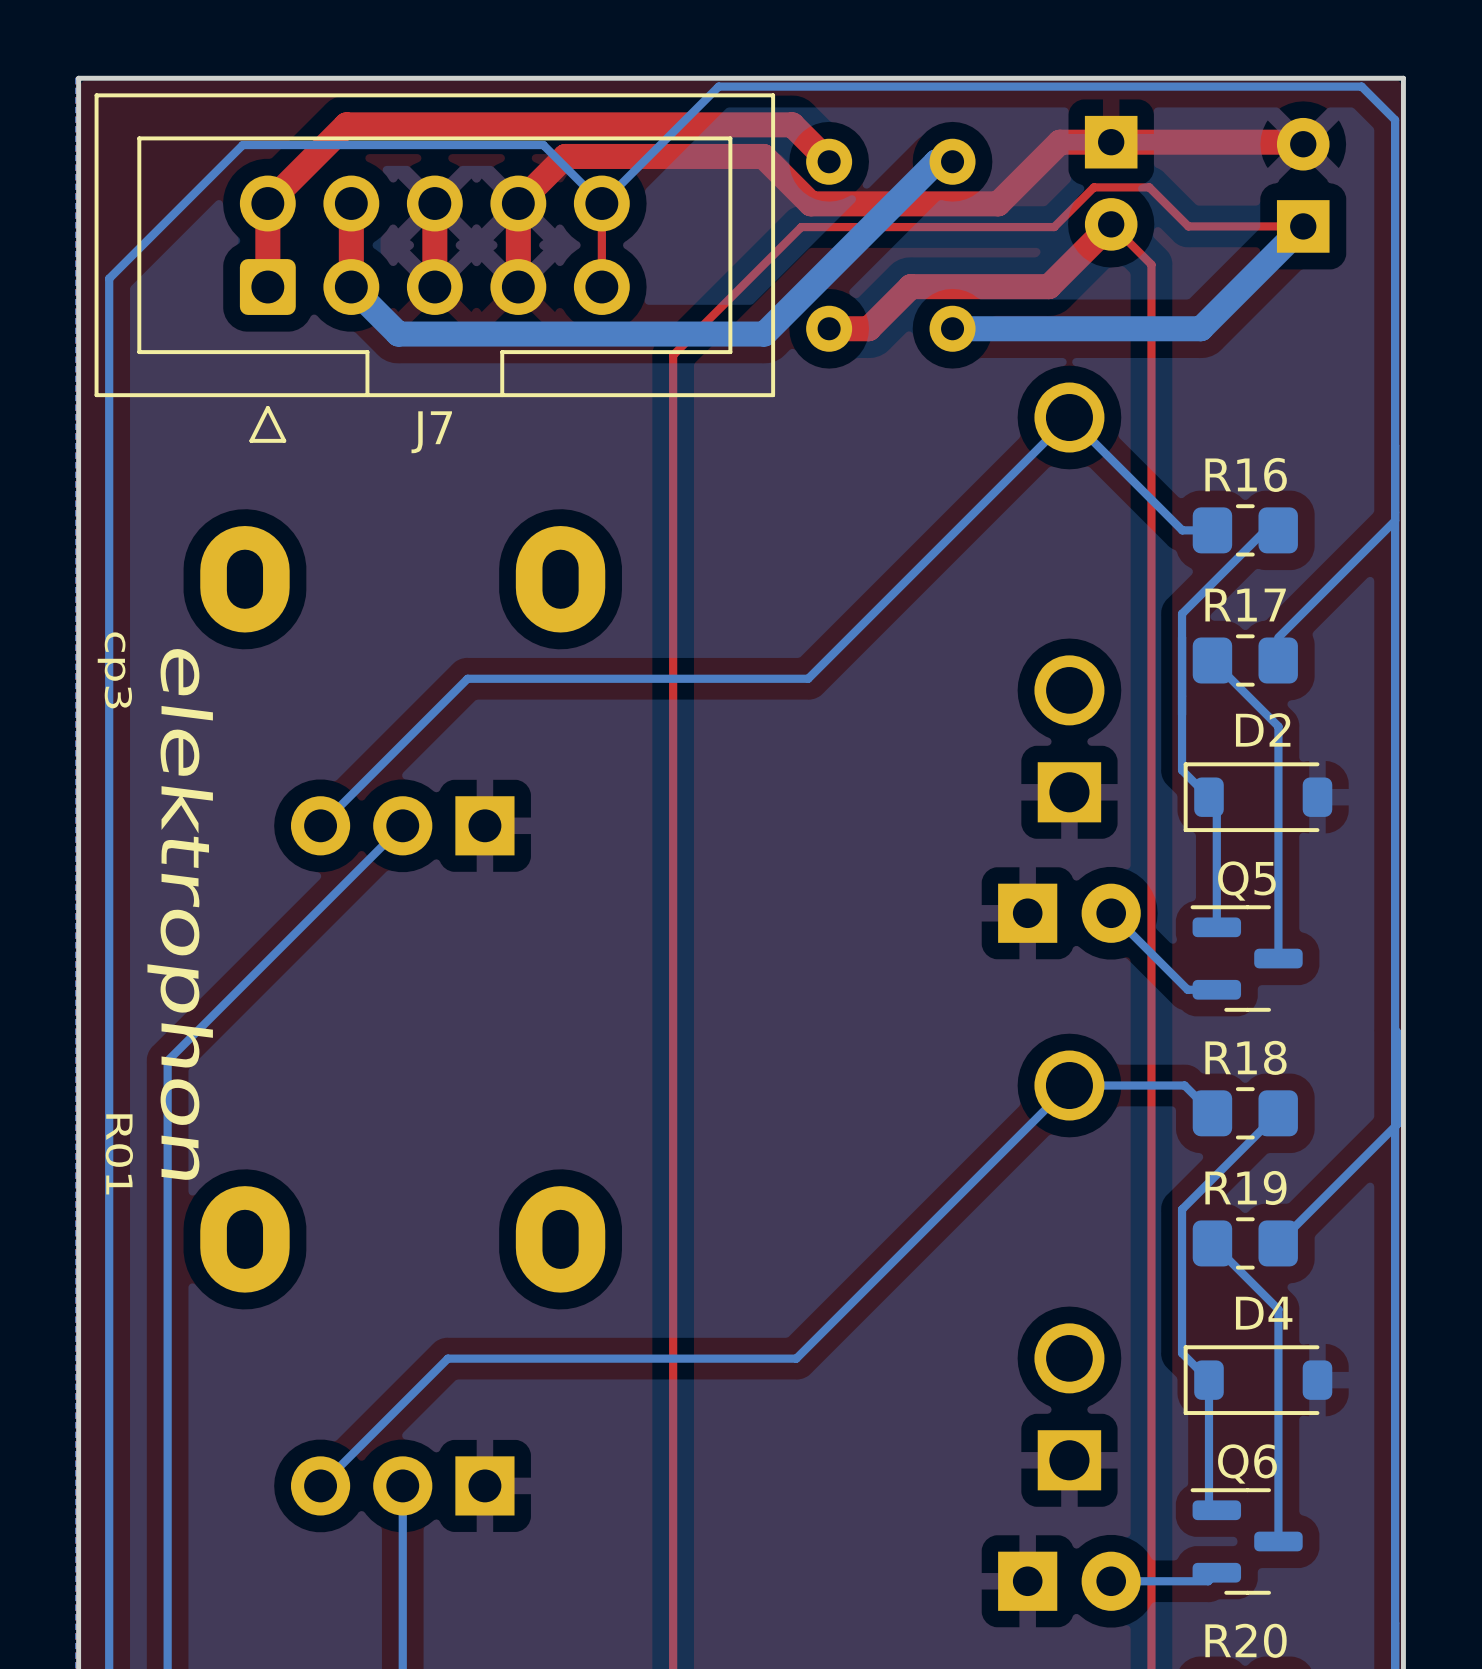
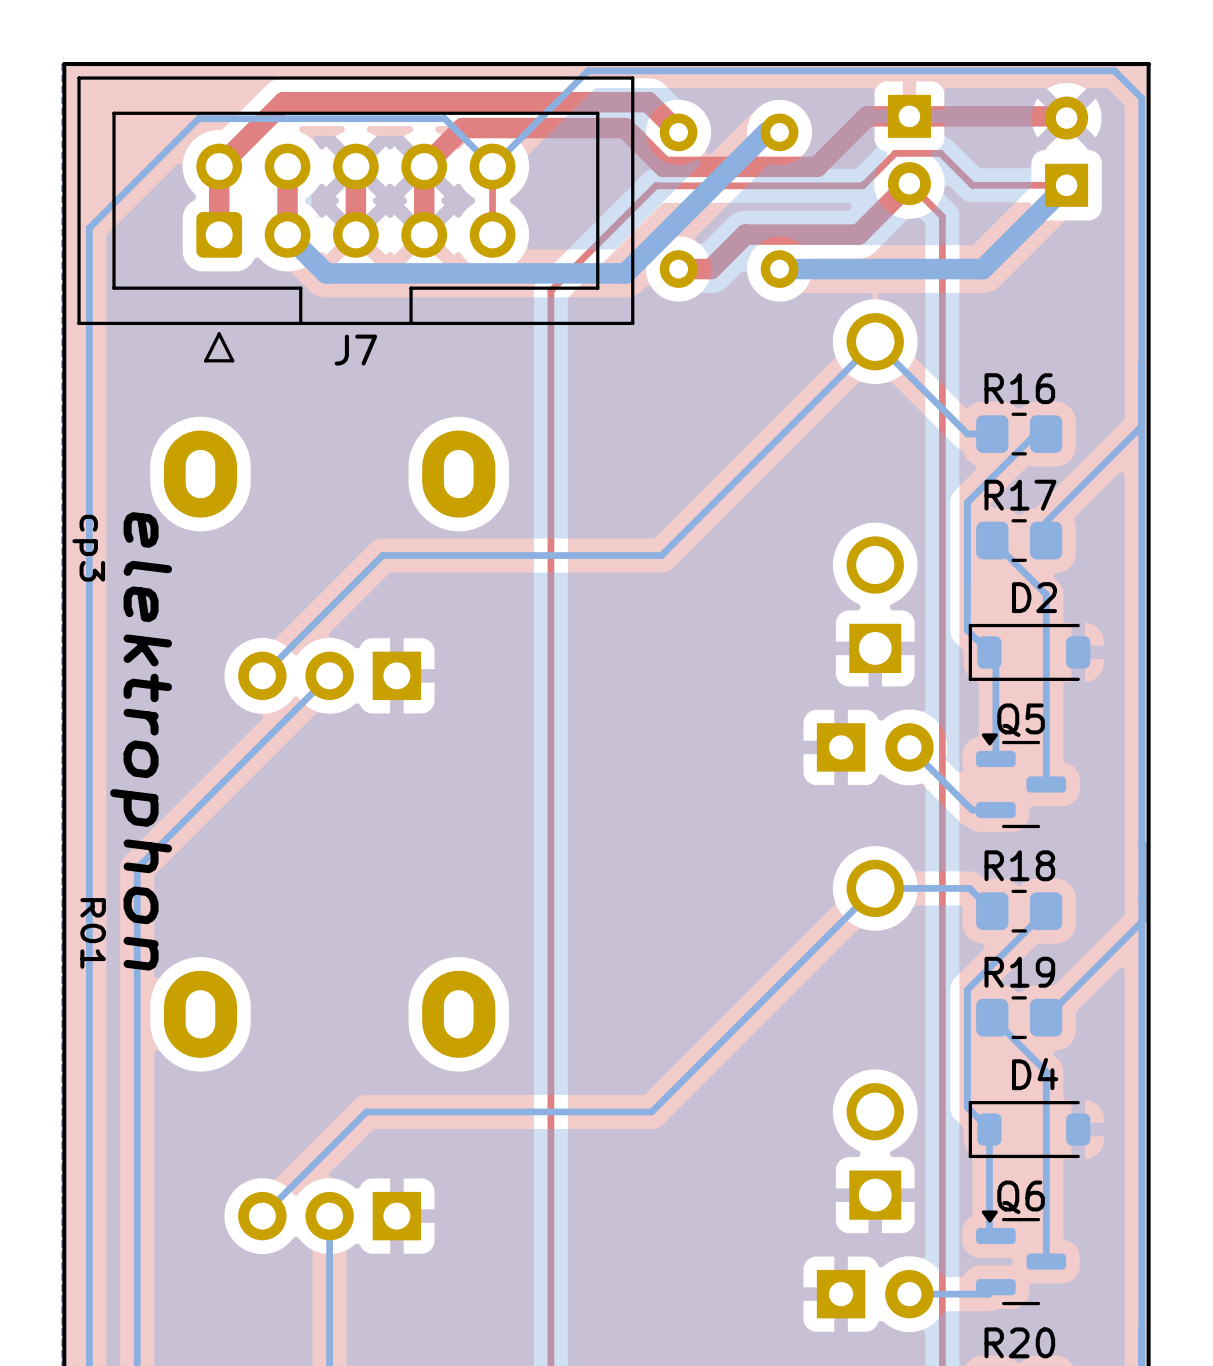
drawing shape: [97, 632, 213, 1195] -> [80, 512, 173, 971]
text: none -> cp3 (88, 548)
Q5 footprint: [1190, 905, 1303, 1012] -> [976, 733, 1067, 829]
Q6 footprint: [1190, 1488, 1303, 1595] -> [976, 1210, 1067, 1306]

